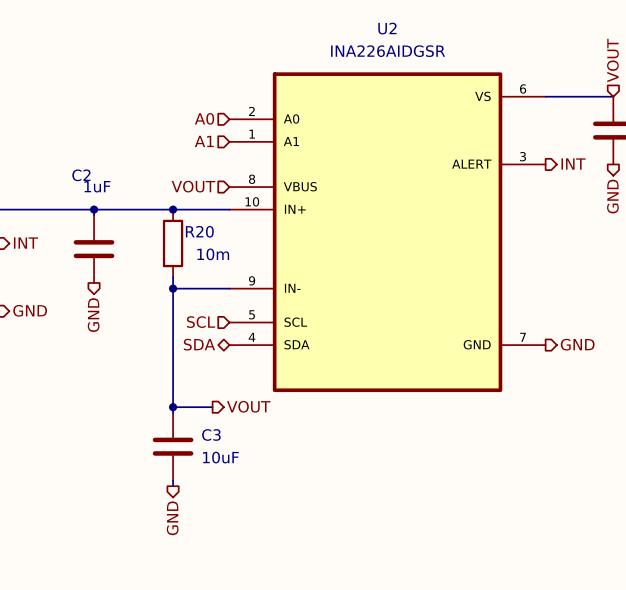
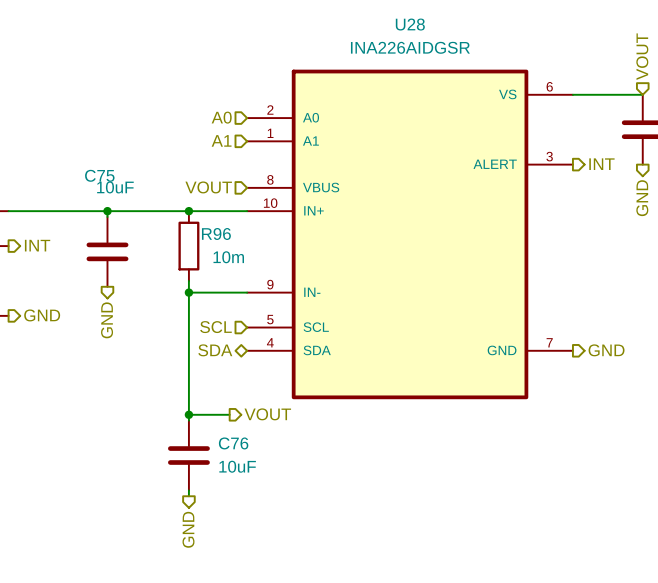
U2 name: U2 (387, 28) -> U28 (410, 24)
C2 name: C2 (81, 175) -> C75 (99, 175)
C2 value: 1uF (97, 186) -> 10uF (115, 187)
R20 name: R20 (199, 231) -> R96 (216, 233)
C3 name: C3 (211, 434) -> C76 (233, 443)

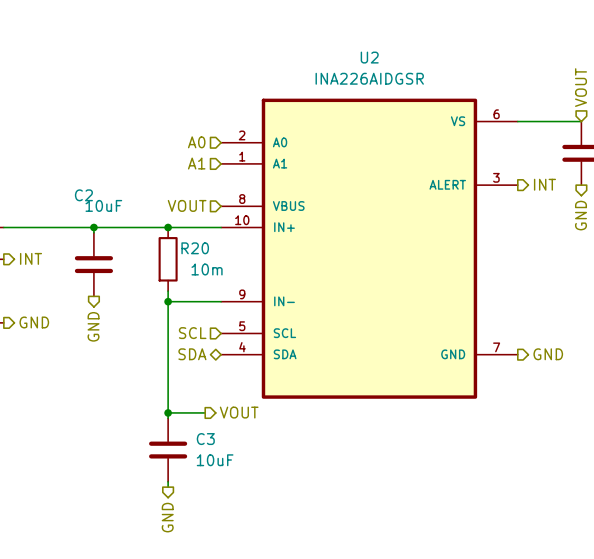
U28 name: U28 (410, 24) -> U2 (369, 57)
C75 name: C75 (99, 175) -> C2 (83, 195)
R96 name: R96 (216, 233) -> R20 (195, 248)
C76 name: C76 (233, 443) -> C3 (205, 439)

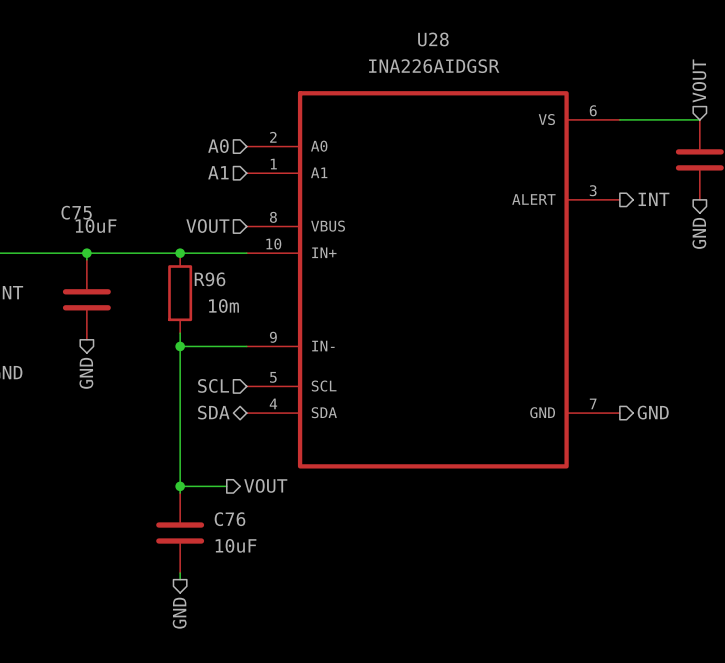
U2 name: U2 (369, 57) -> U28 (433, 39)
C2 name: C2 (83, 195) -> C75 (76, 212)
R20 name: R20 (195, 248) -> R96 (210, 279)
C3 name: C3 (205, 439) -> C76 (230, 519)

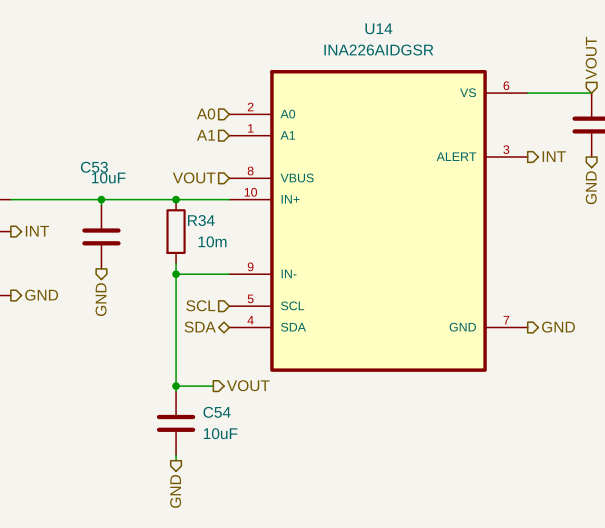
U28 name: U28 (433, 39) -> U14 (378, 28)
C75 name: C75 (76, 212) -> C53 (94, 167)
R96 name: R96 (210, 279) -> R34 (201, 220)
C76 name: C76 (230, 519) -> C54 (217, 412)

